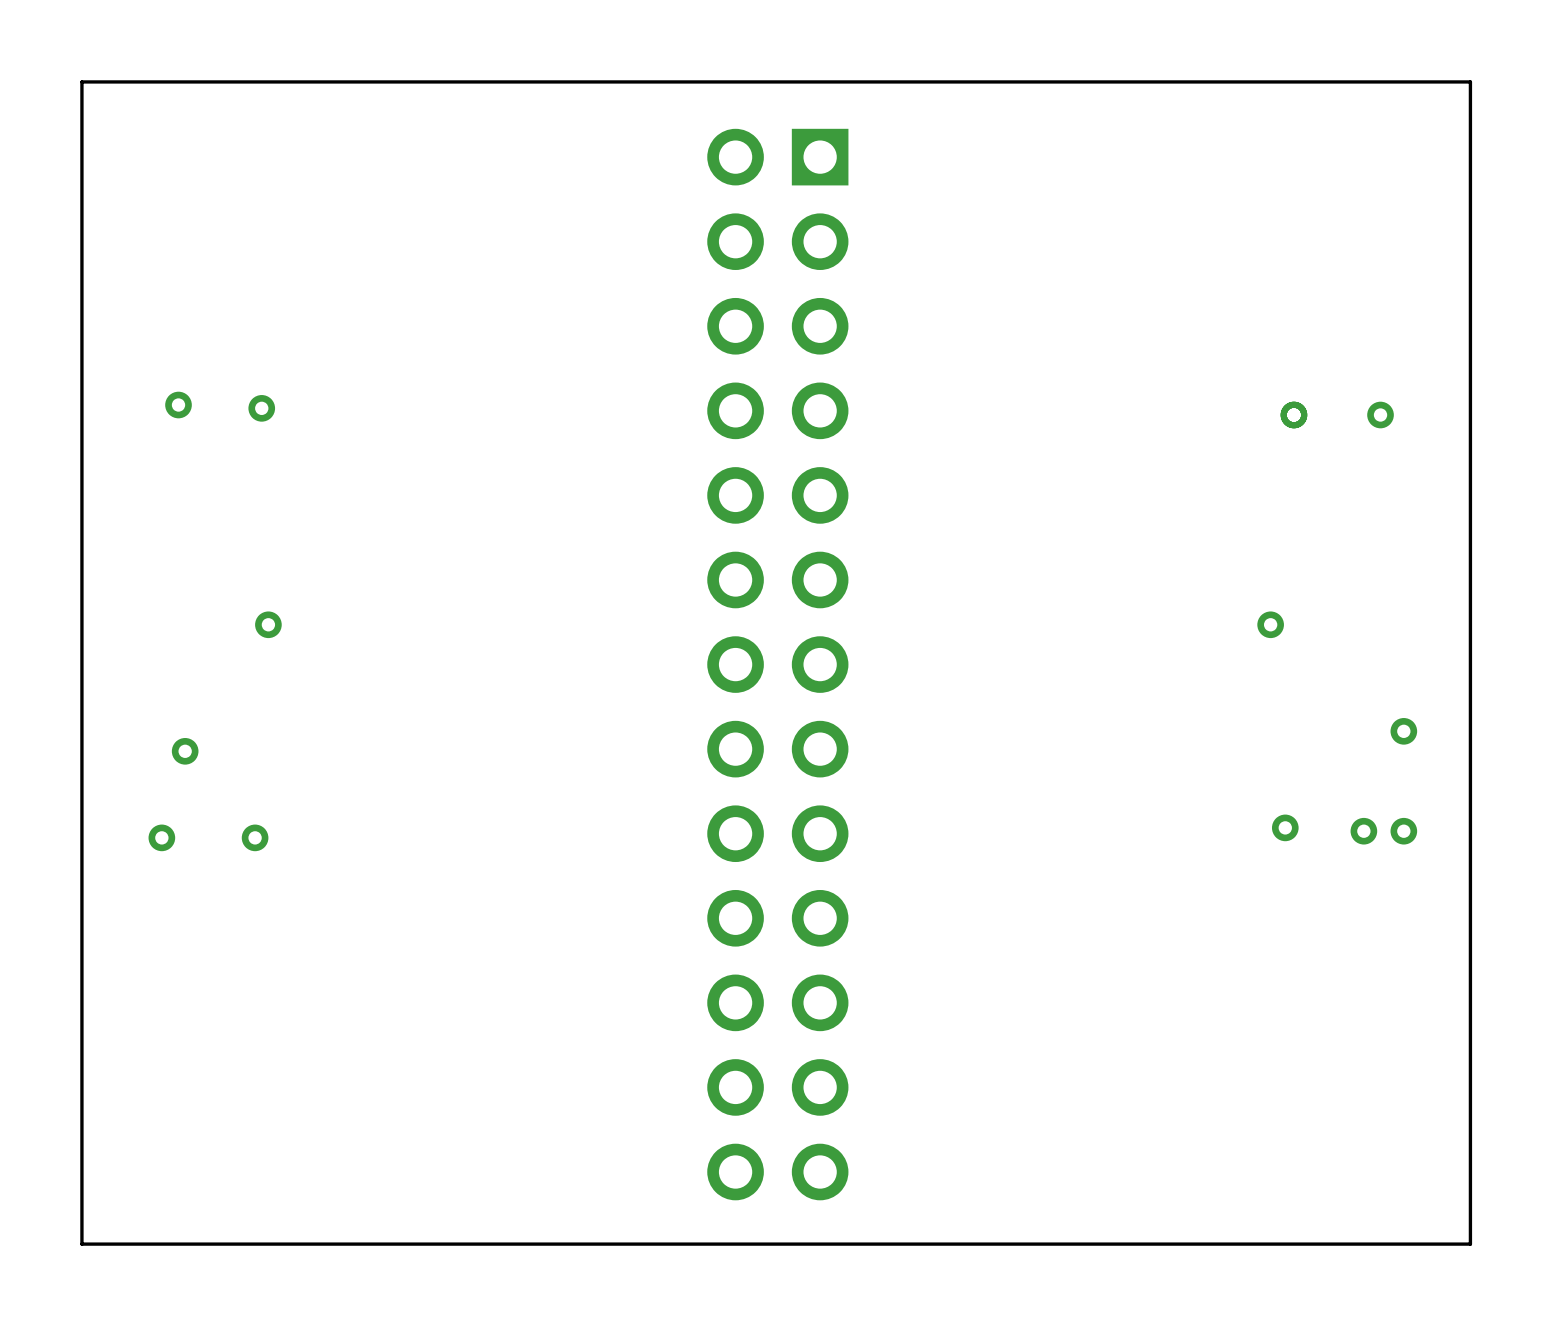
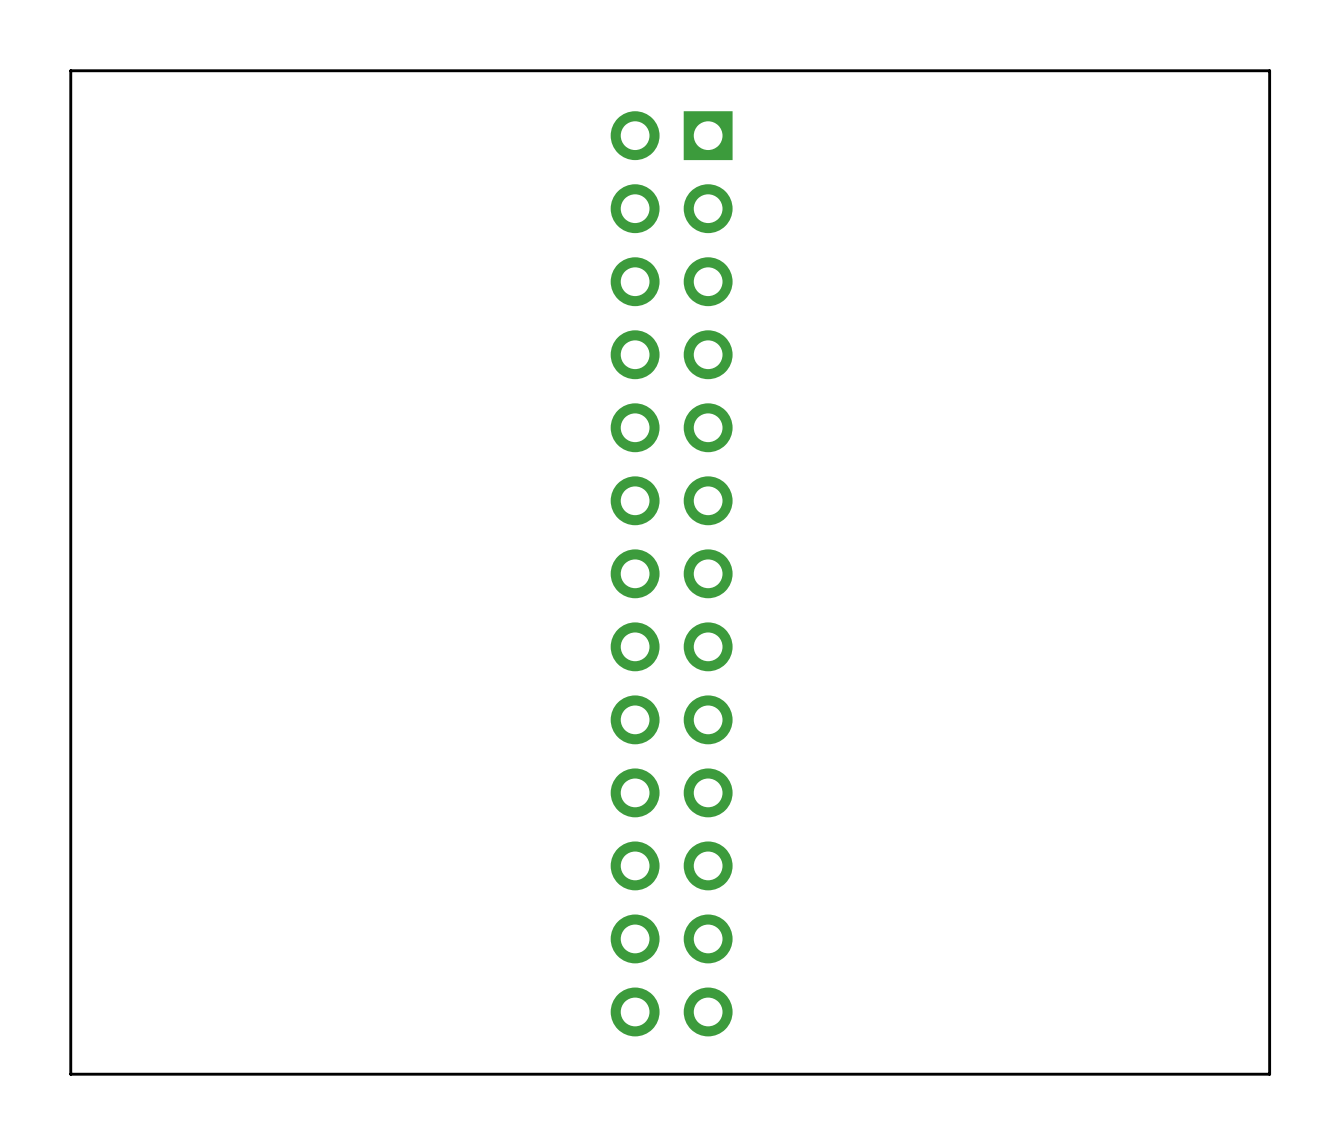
via: (178, 405) -> none
via: (261, 408) -> none
via: (1293, 415) -> none
via: (1380, 415) -> none
via: (268, 624) -> none
via: (1270, 624) -> none
via: (1403, 731) -> none
via: (185, 751) -> none
via: (1285, 827) -> none
via: (1363, 831) -> none
via: (1403, 831) -> none
via: (161, 837) -> none
via: (255, 837) -> none

